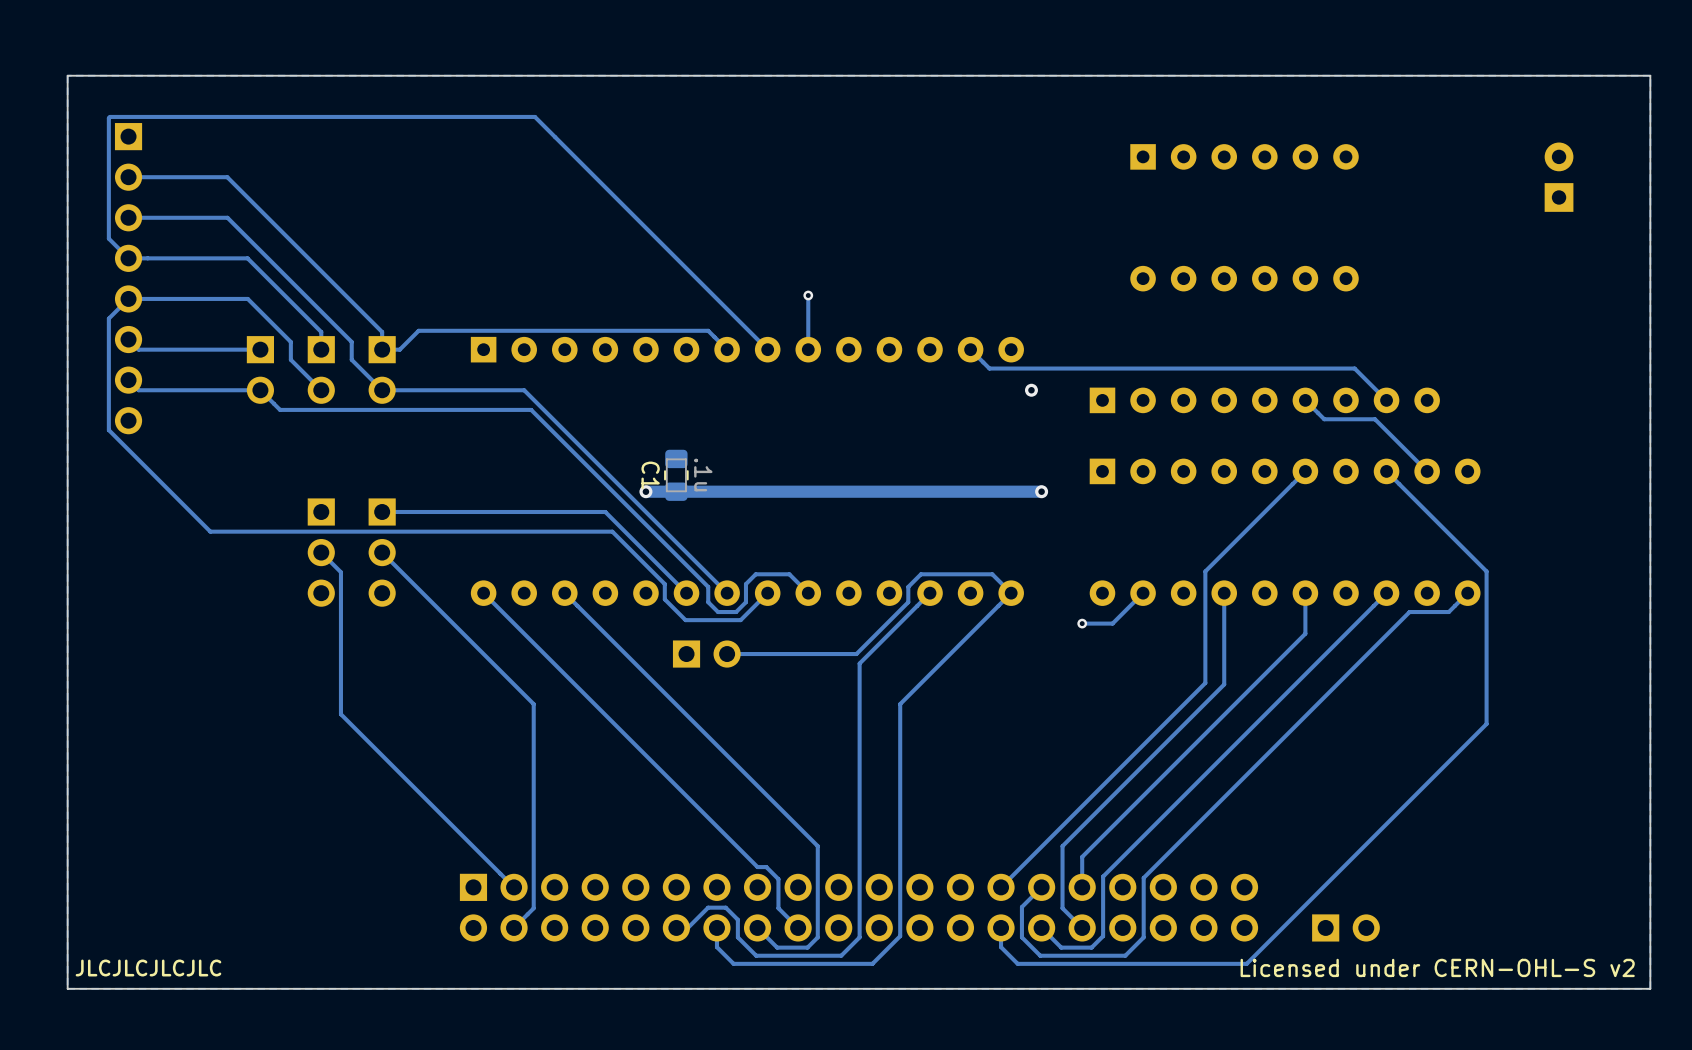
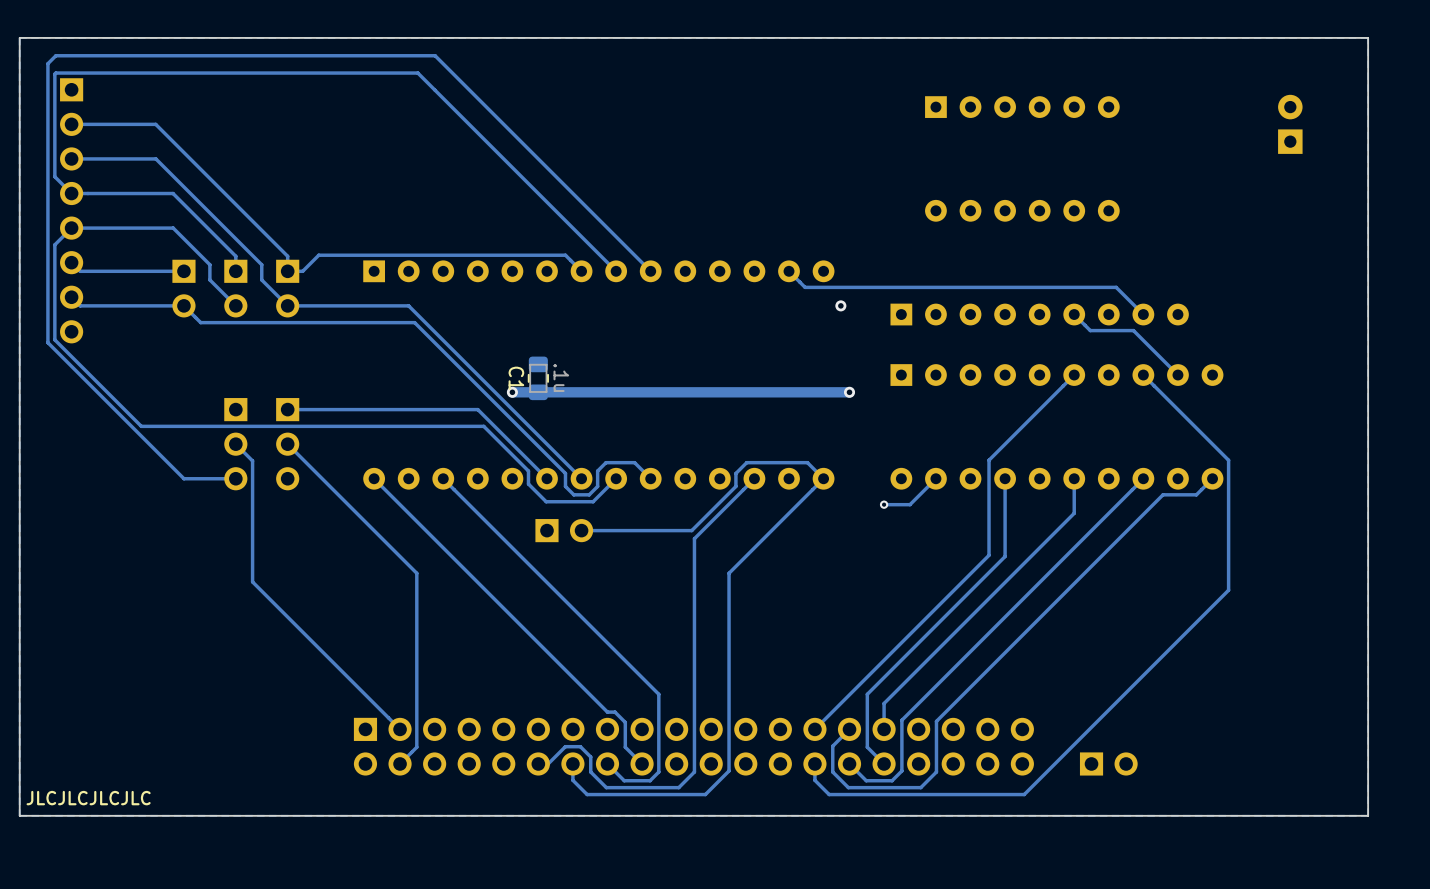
track: (808, 295) (808, 349) -> (235, 478) (183, 478) (47, 342) (47, 63) (55, 55) (435, 55) (650, 271)
via: (808, 295) -> none
text: Licensed under CERN-OHL-S v2 (1437, 967) -> none

